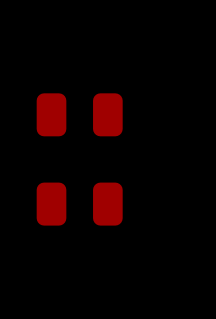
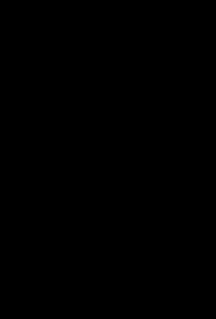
part: (79, 114) -> none
part: (79, 204) -> none

